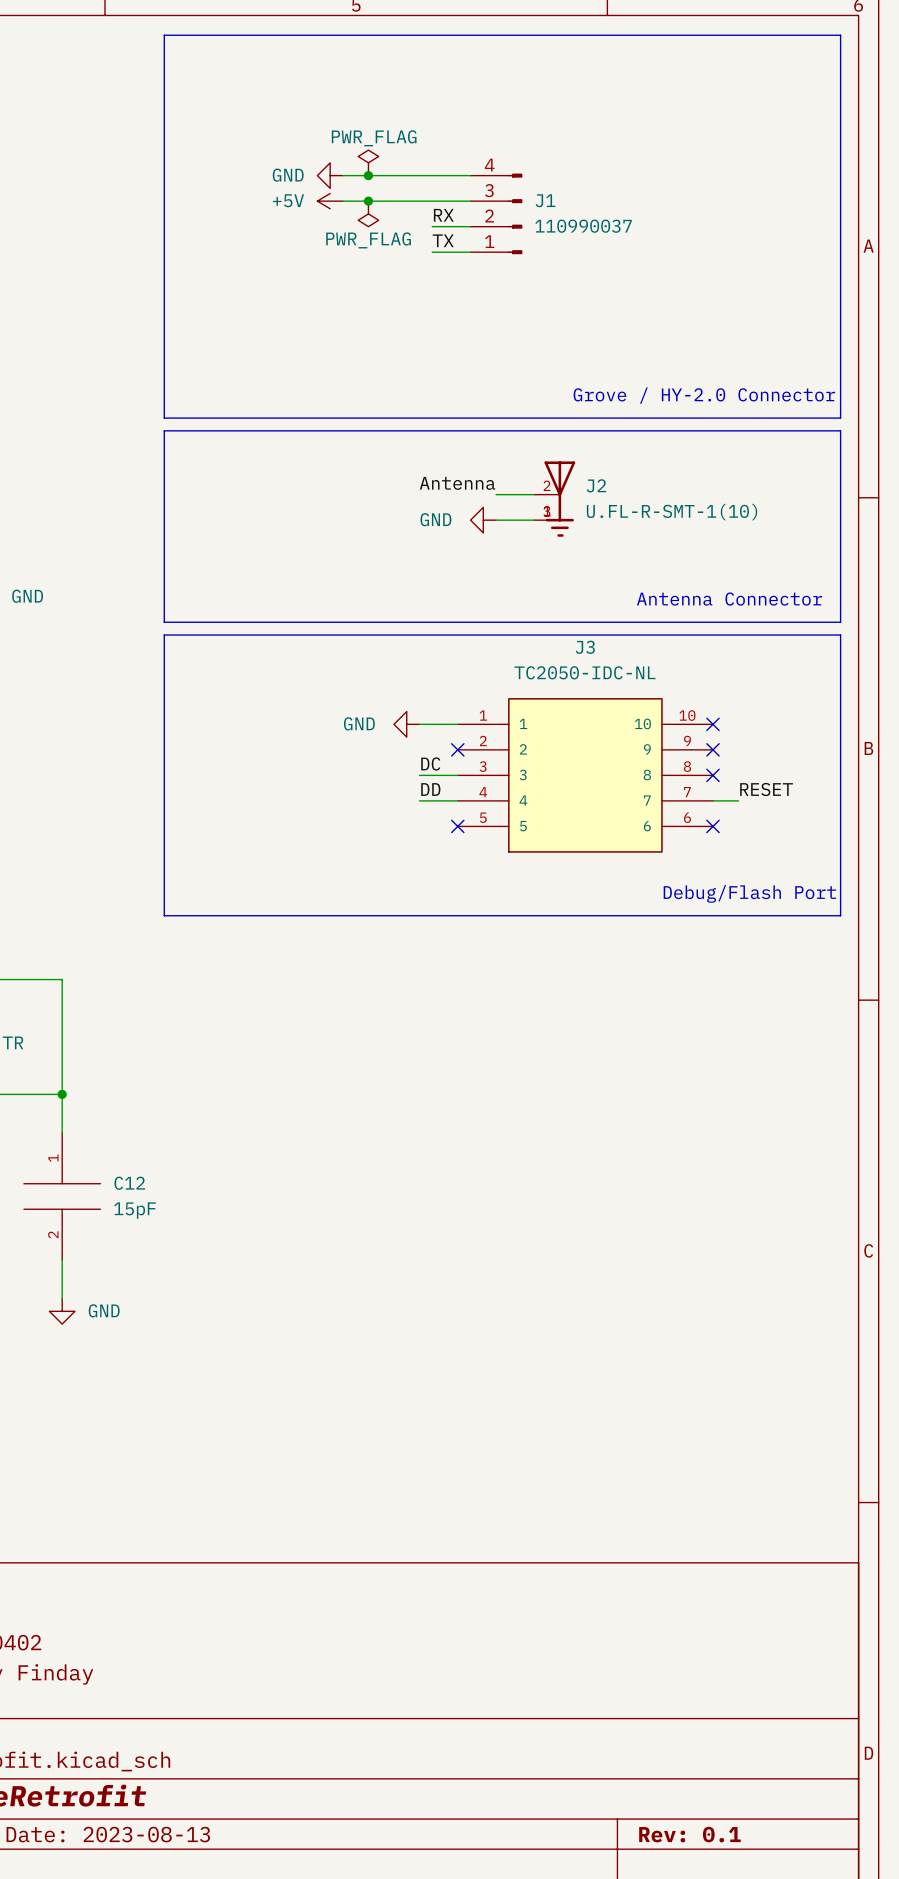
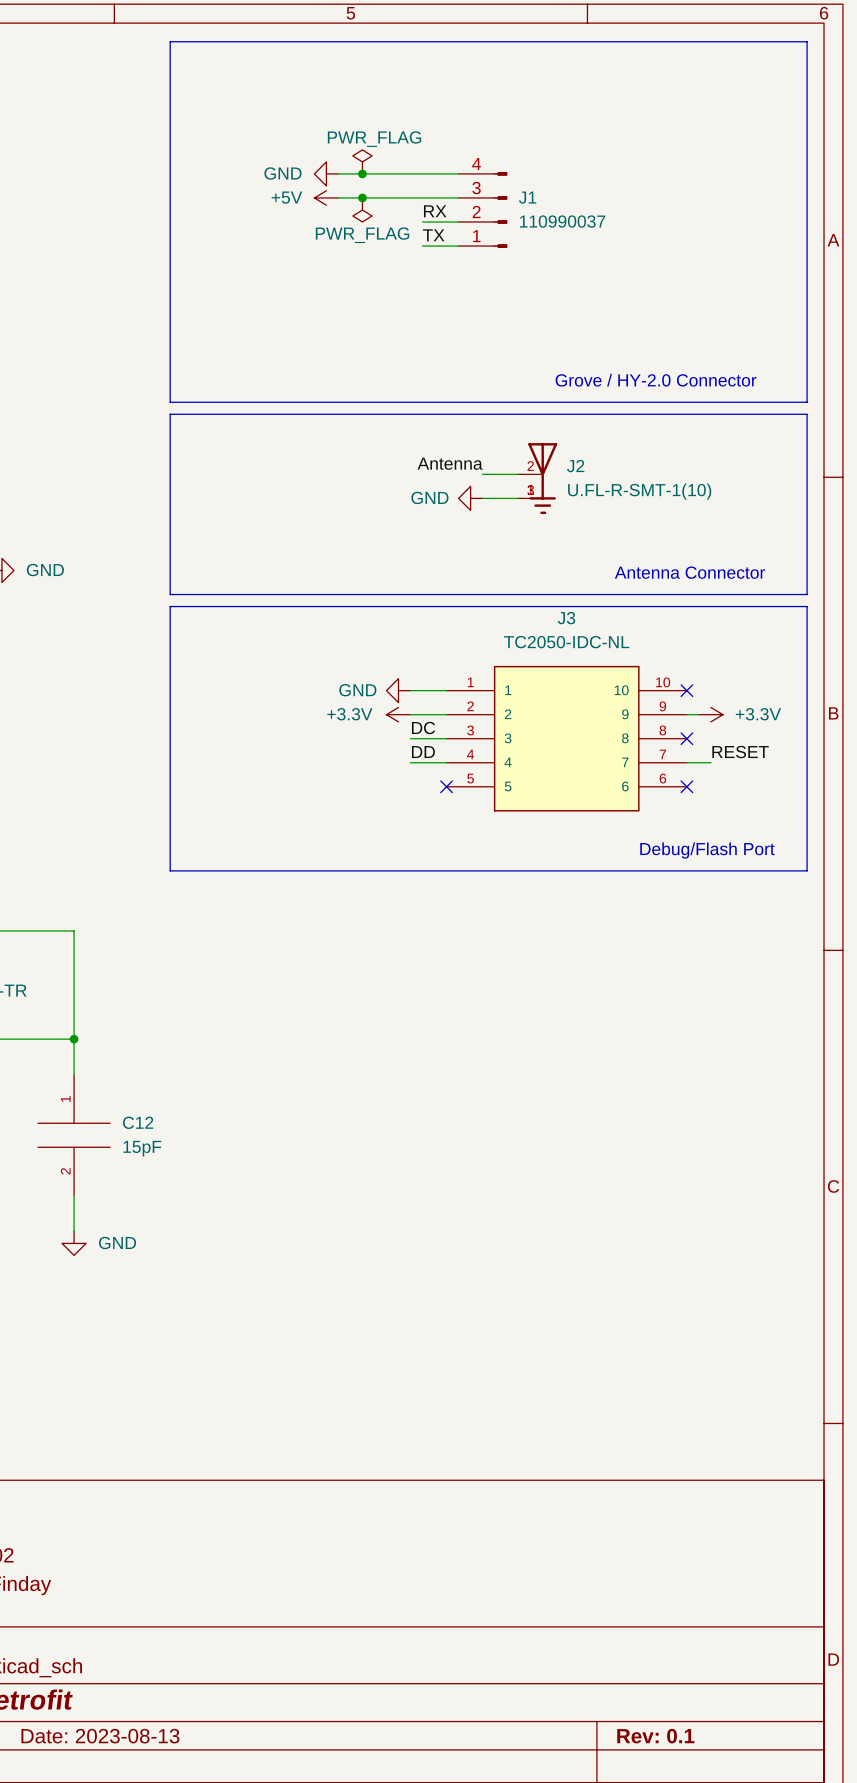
power symbol: none -> +3.3V (398, 714)
wire: none -> (410, 714) (446, 714)
no-connect mark: (457, 749) -> none
wire: none -> (686, 714) (698, 714)
no-connect mark: (712, 749) -> none
power symbol: none -> +3.3V (710, 714)

